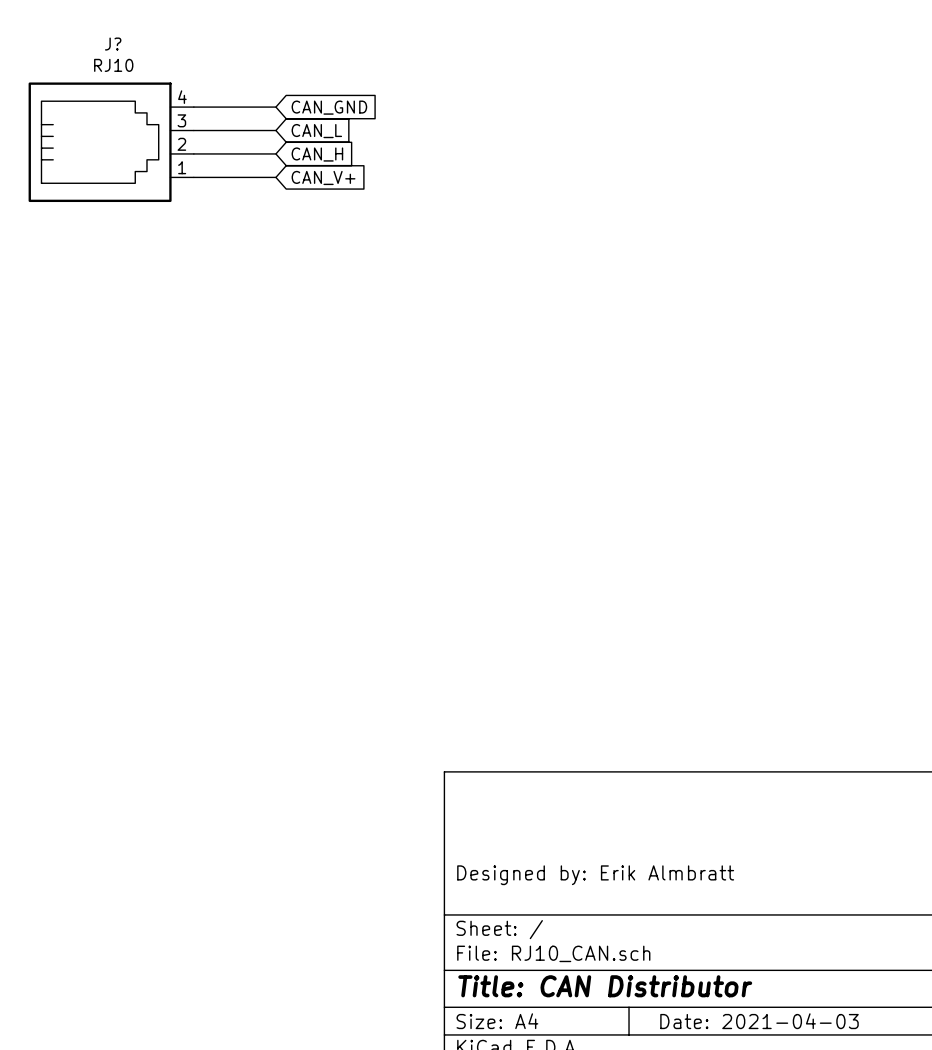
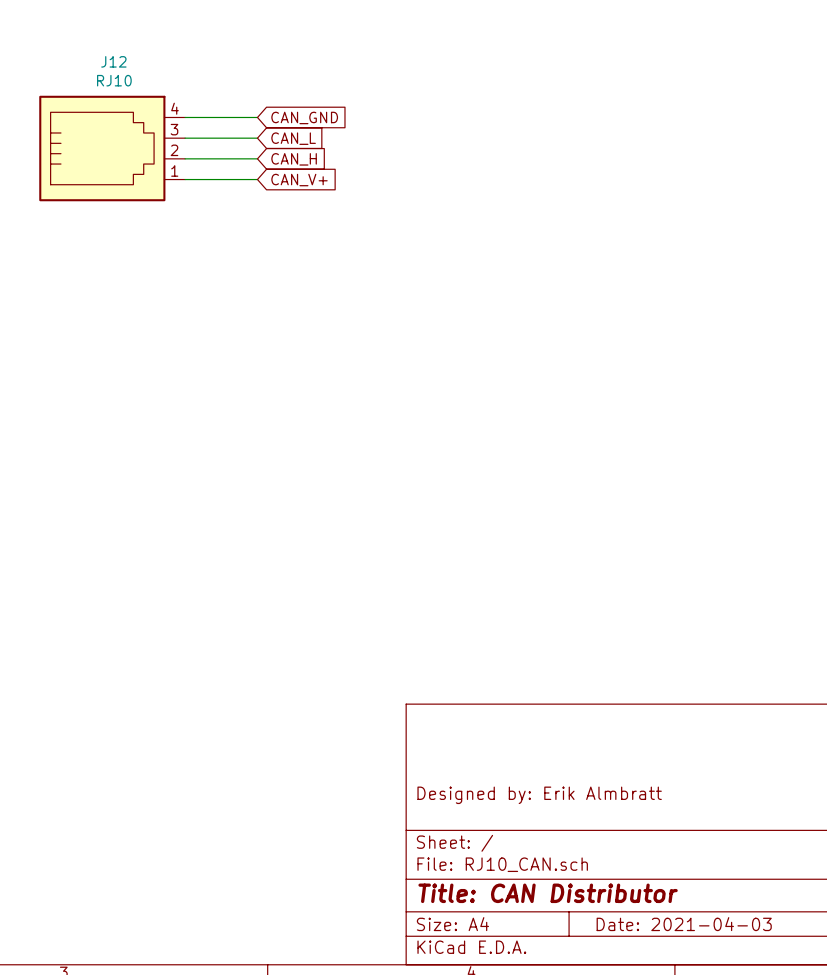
J? name: J? (113, 44) -> J12 (113, 61)

